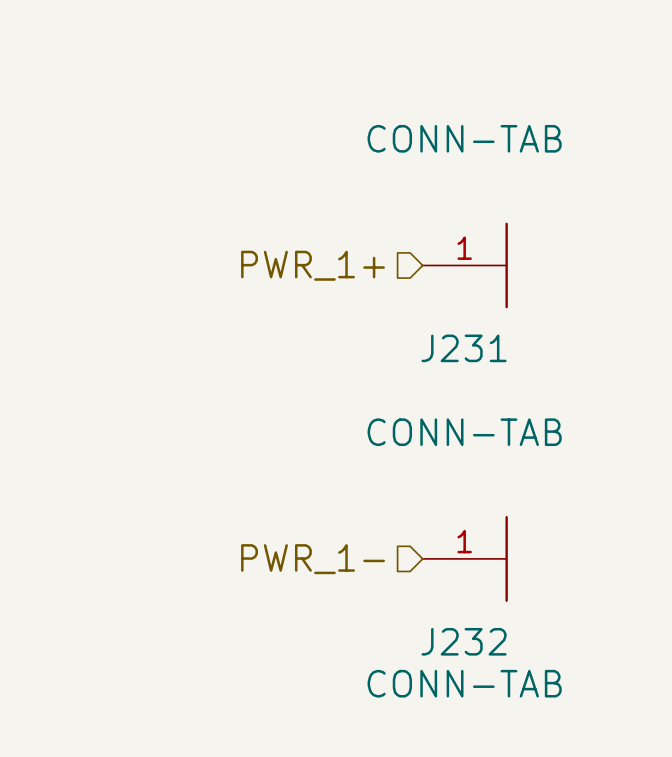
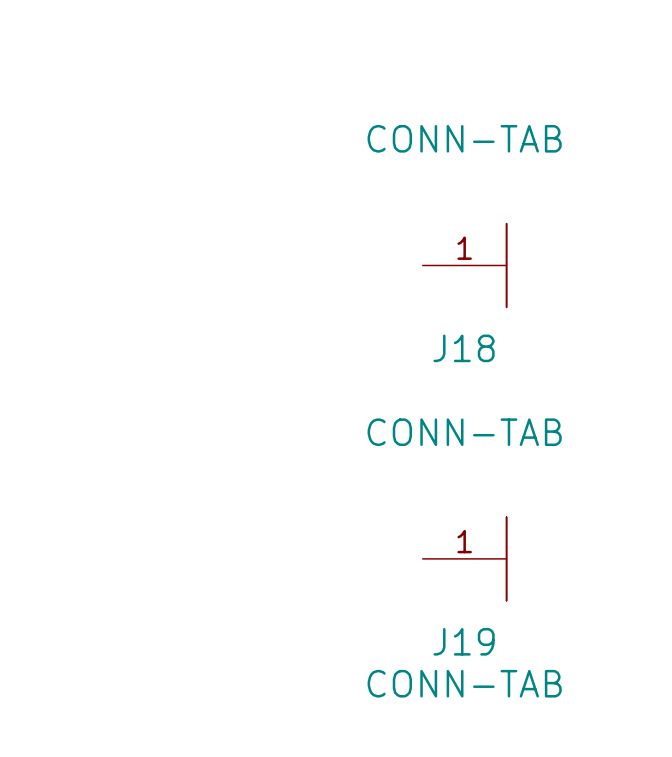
hierarchical label: PWR_1+ (313, 265) -> none
J231 name: J231 (464, 348) -> J18 (464, 348)
hierarchical label: PWR_1- (313, 559) -> none
J232 name: J232 (464, 641) -> J19 (464, 641)

